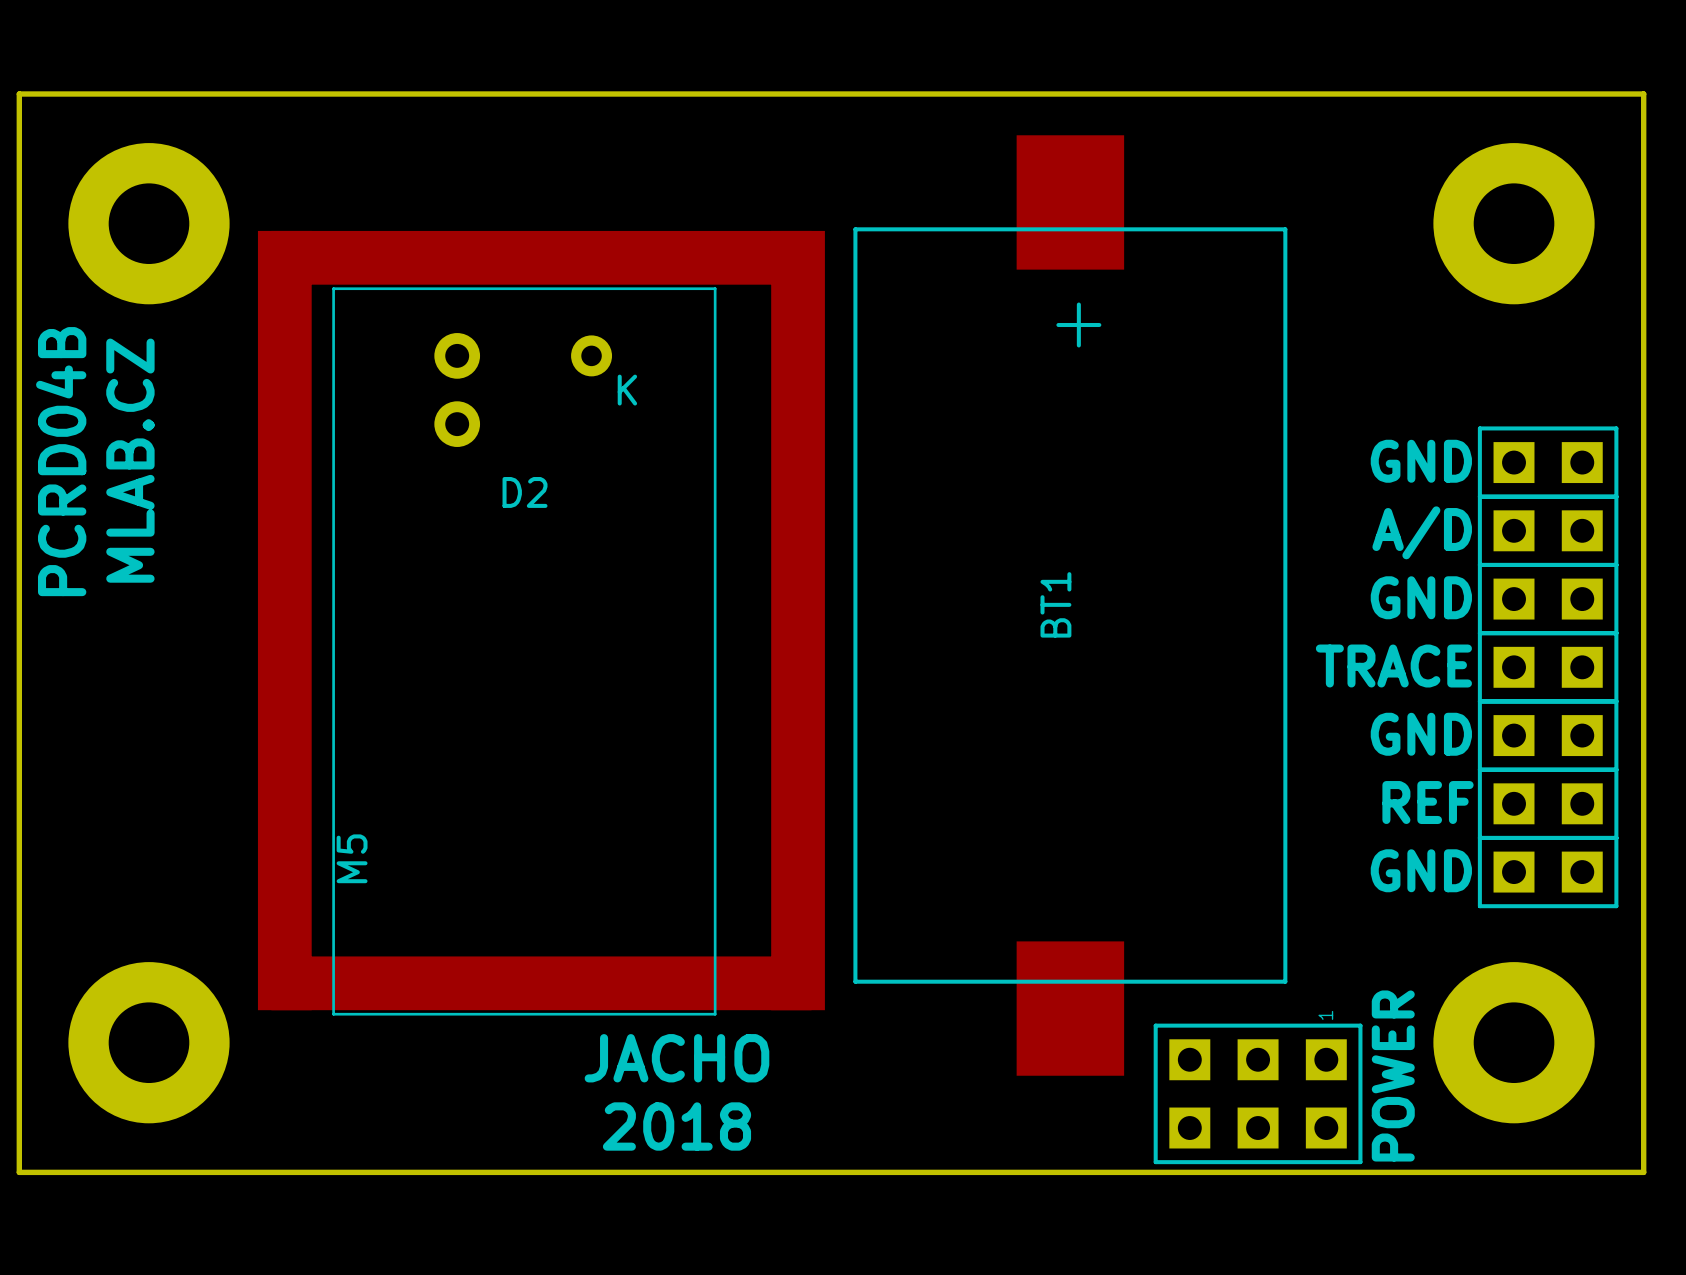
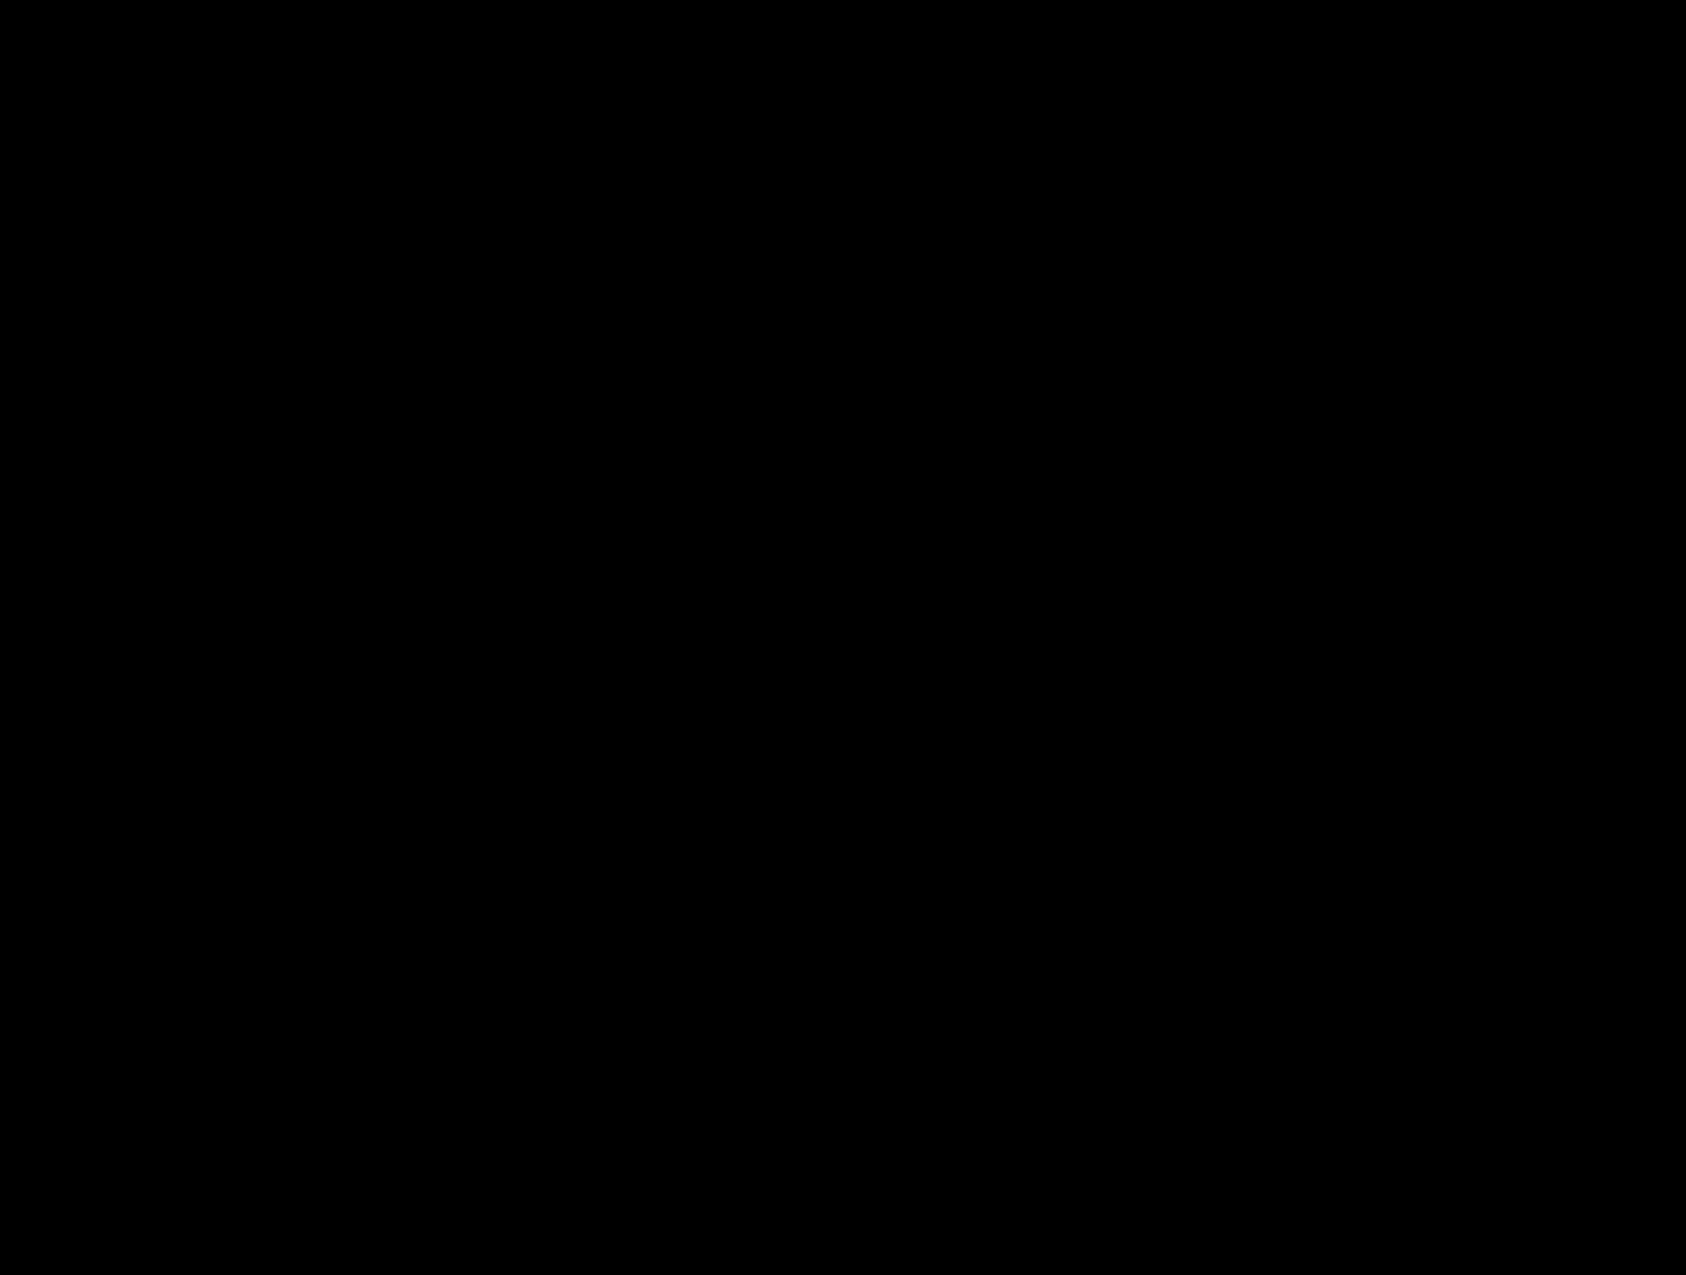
board edge: (19, 94) (19, 1172) (1643, 1172) (1643, 94) (19, 94) -> none
part: (148, 223) -> none
part: (1514, 223) -> none
text: MLAB.CZ (130, 460) -> none
text: PCRD04B (61, 461) -> none
text: GND (1421, 461) -> none
part: (1548, 462) -> none
part: (1548, 530) -> none
text: A/D (1422, 532) -> none
text: GND (1421, 597) -> none
part: (1548, 599) -> none
BT1: (1070, 605) -> none
M5: (541, 620) -> none
D2: (524, 651) -> none
text: TRACE (1393, 666) -> none
part: (1548, 667) -> none
text: GND (1421, 734) -> none
part: (1548, 735) -> none
text: REF (1428, 802) -> none
part: (1548, 803) -> none
text: GND (1421, 870) -> none
part: (1548, 872) -> none
part: (148, 1042) -> none
part: (1514, 1042) -> none
text: JACHO (676, 1058) -> none
text: POWER (1393, 1075) -> none
part: (1258, 1093) -> none
text: 2018 (676, 1126) -> none

